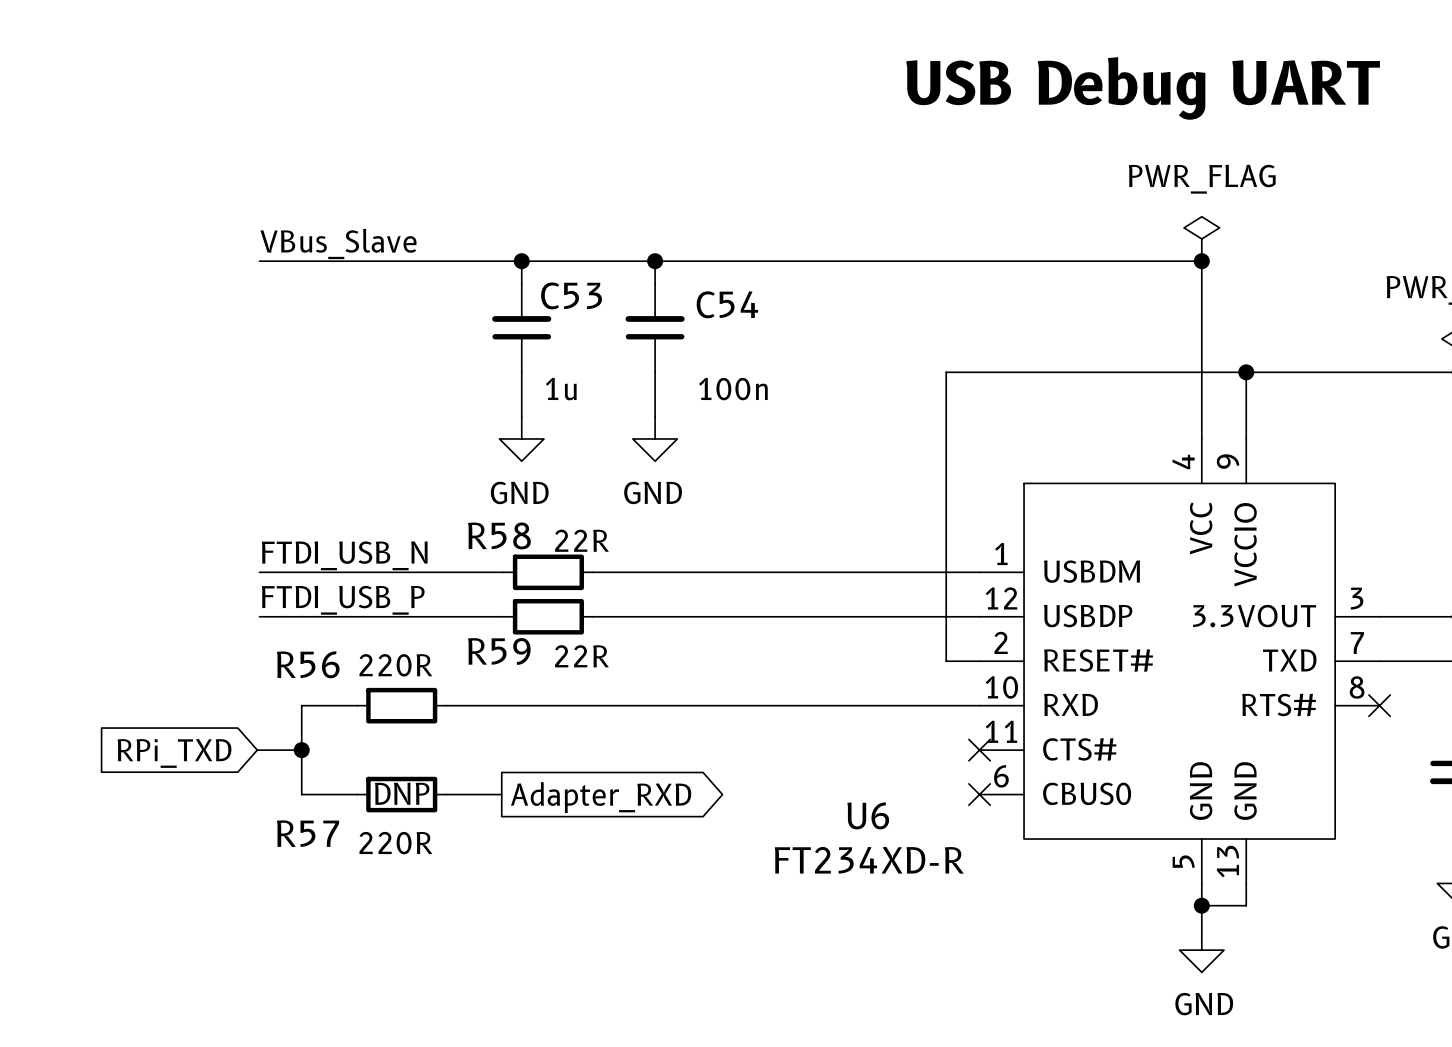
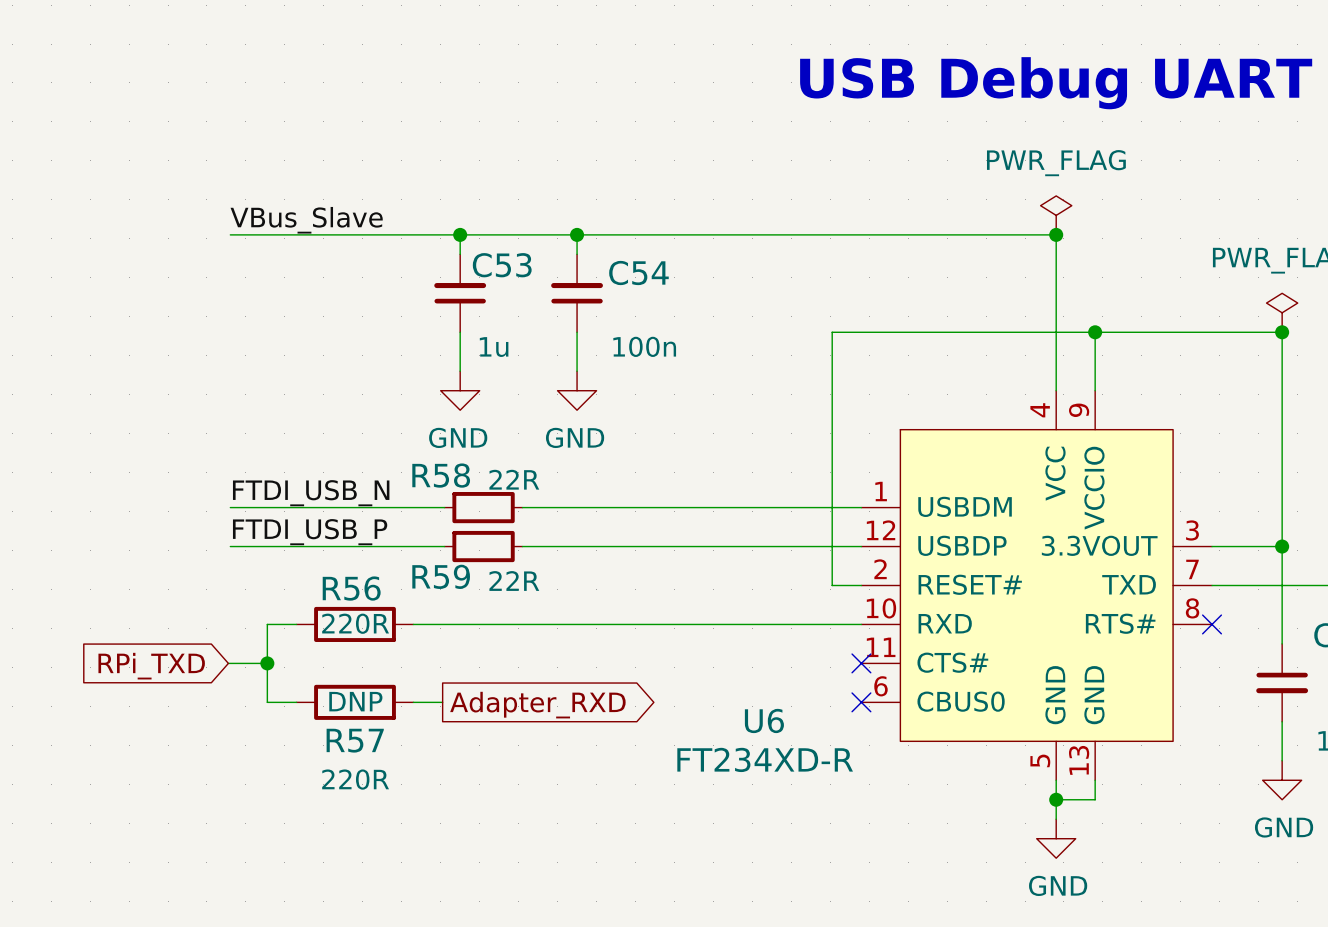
R56 name position: R56 (308, 664) -> R56 (351, 588)
R56 text position: 220R (395, 665) -> 220R (355, 623)
R56 symbol: [357, 687, 447, 724] -> [296, 606, 414, 642]
R57 symbol: [357, 776, 447, 813] -> [296, 684, 414, 720]
R57 name position: R57 (308, 833) -> R57 (355, 740)
R57 text position: 220R (395, 843) -> 220R (355, 779)

